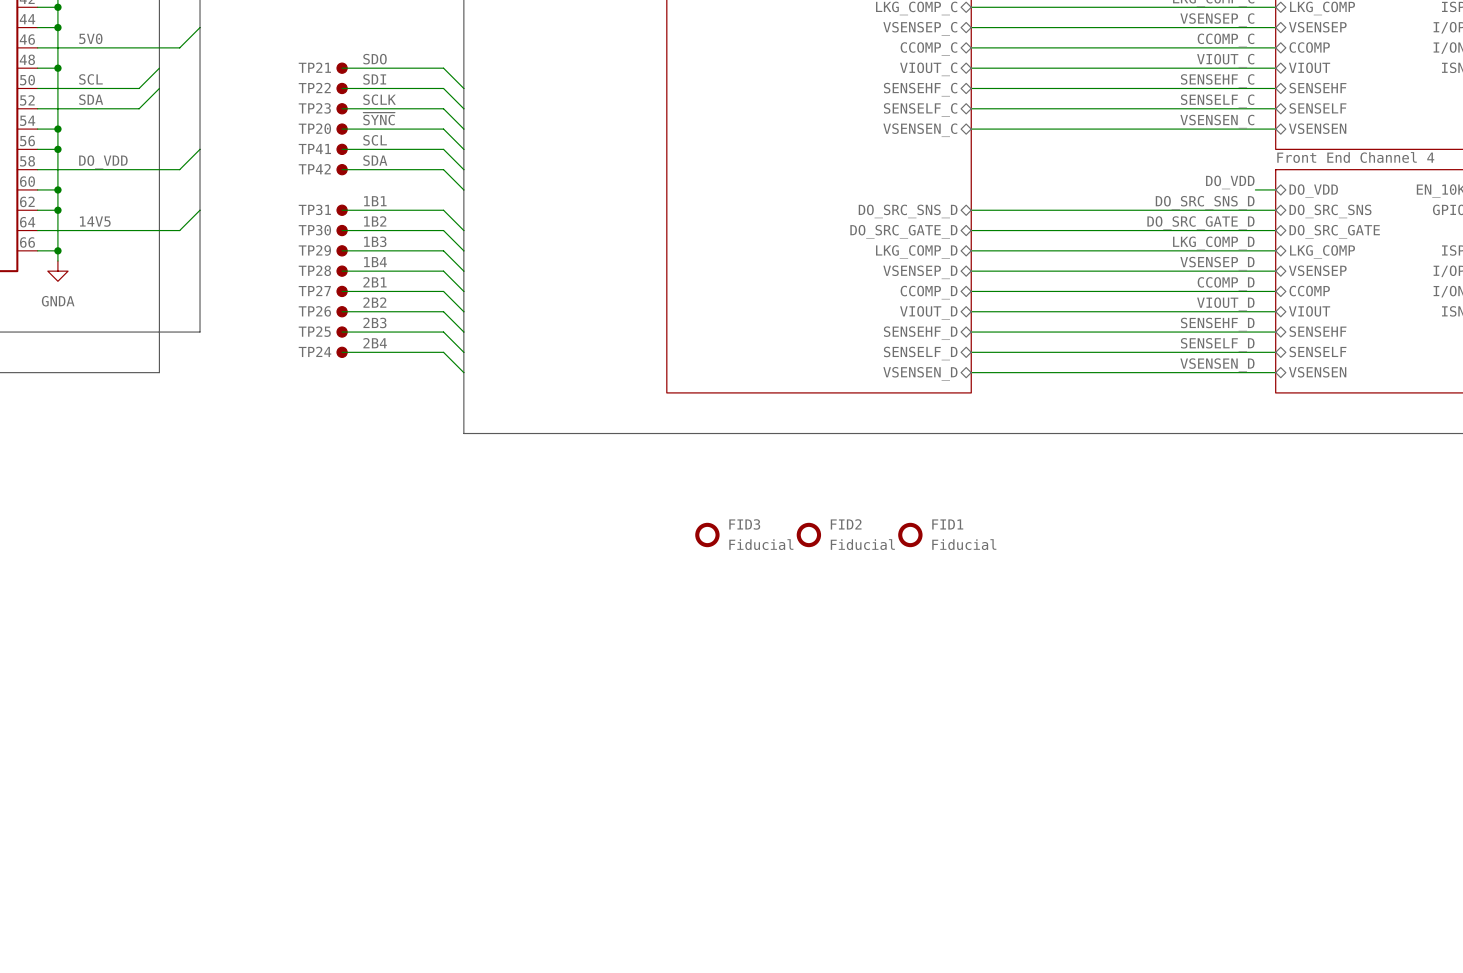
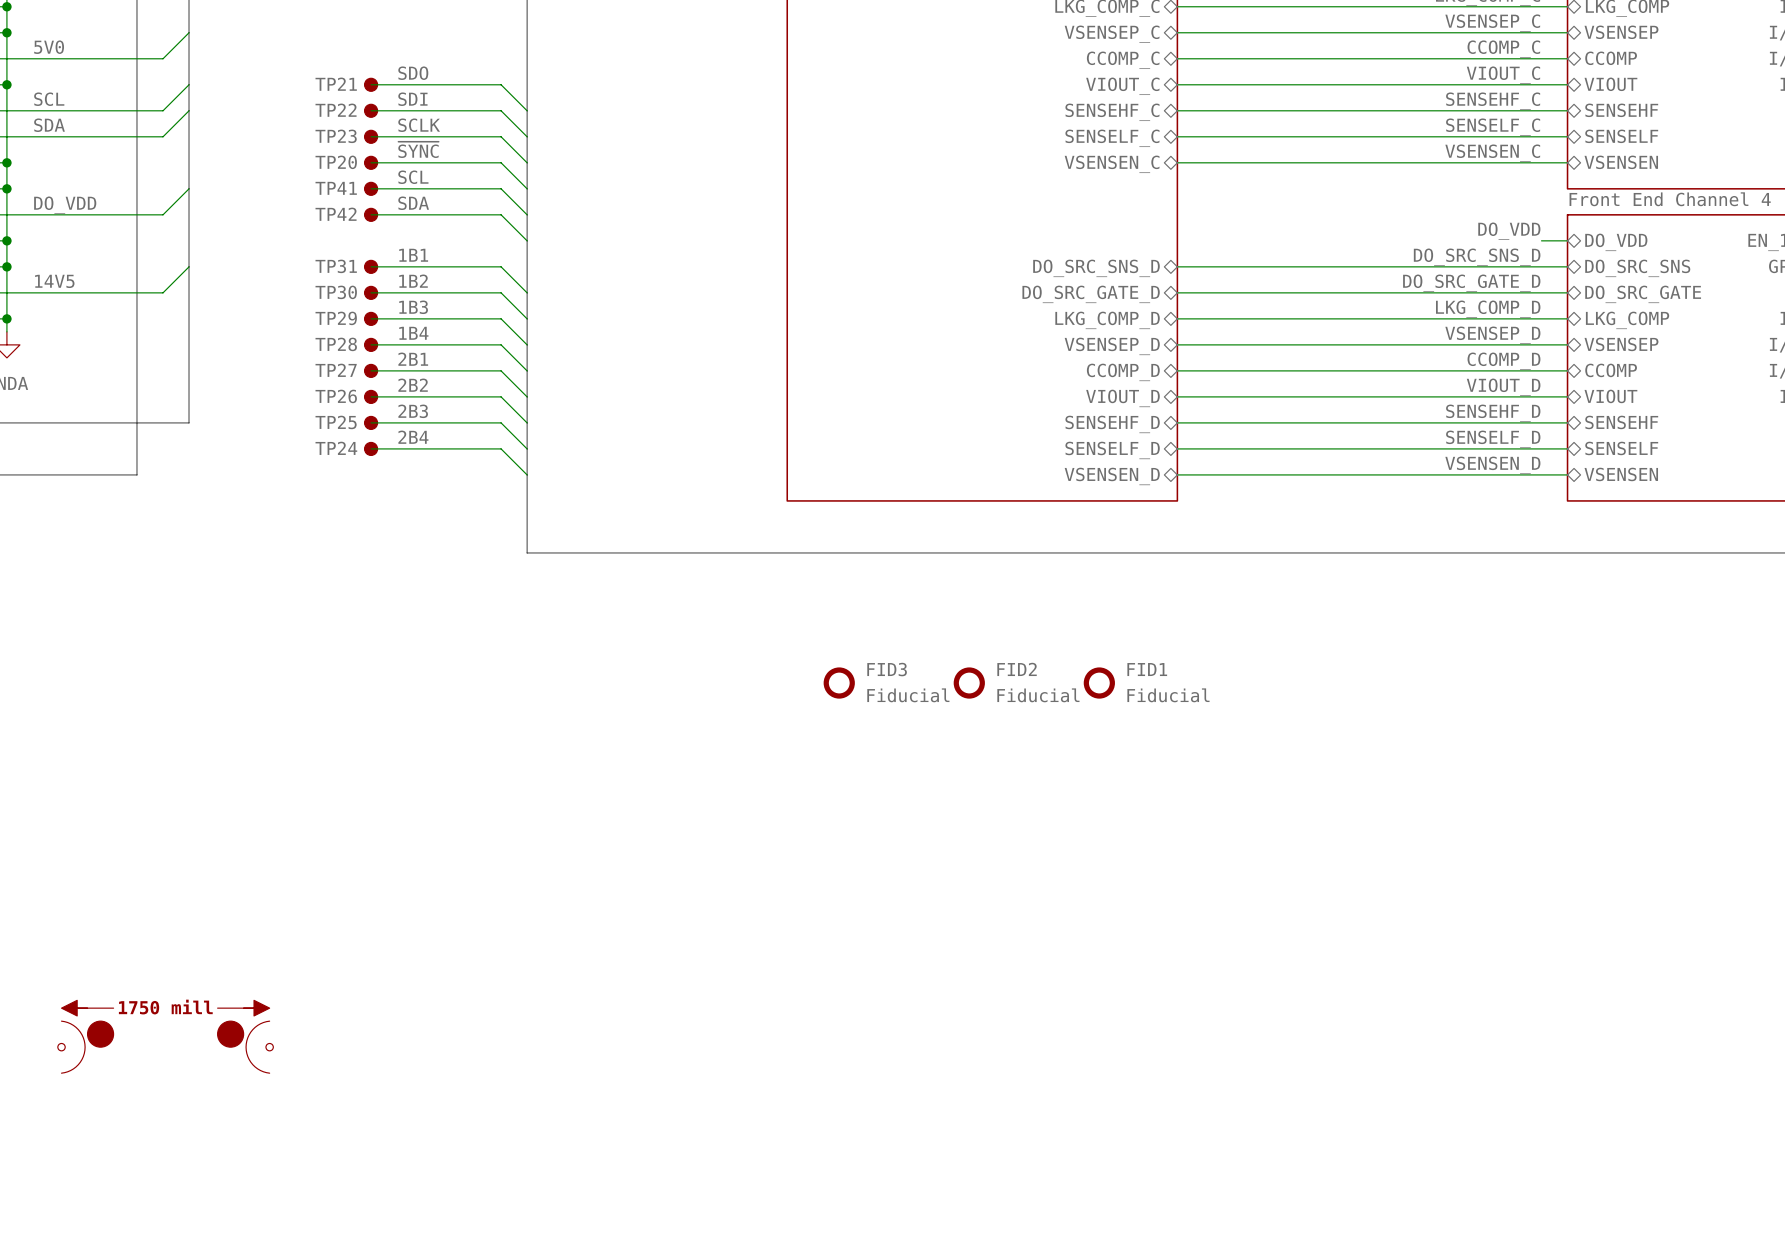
wire: (159, 68) (139, 88) -> (189, 84) (162, 110) (110, 110)
wire: (159, 88) (139, 108) -> (189, 110) (162, 136) (110, 136)
part: none -> (165, 1036)

